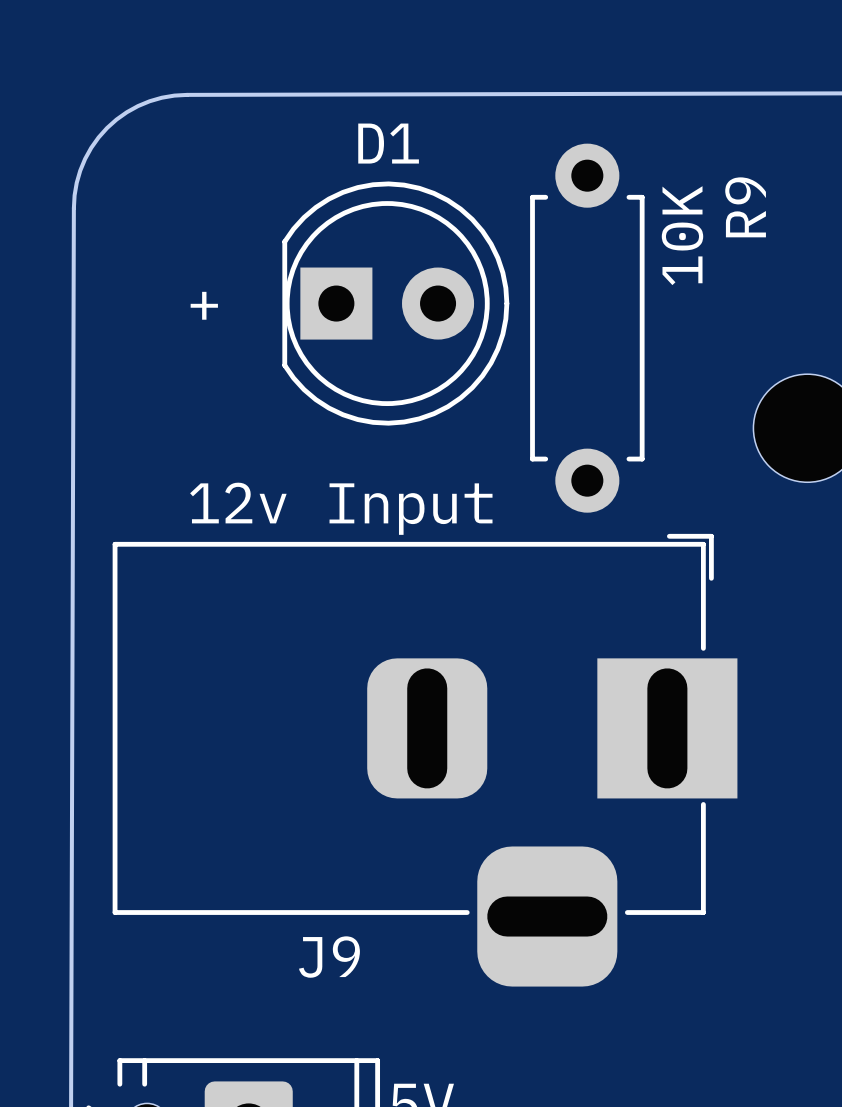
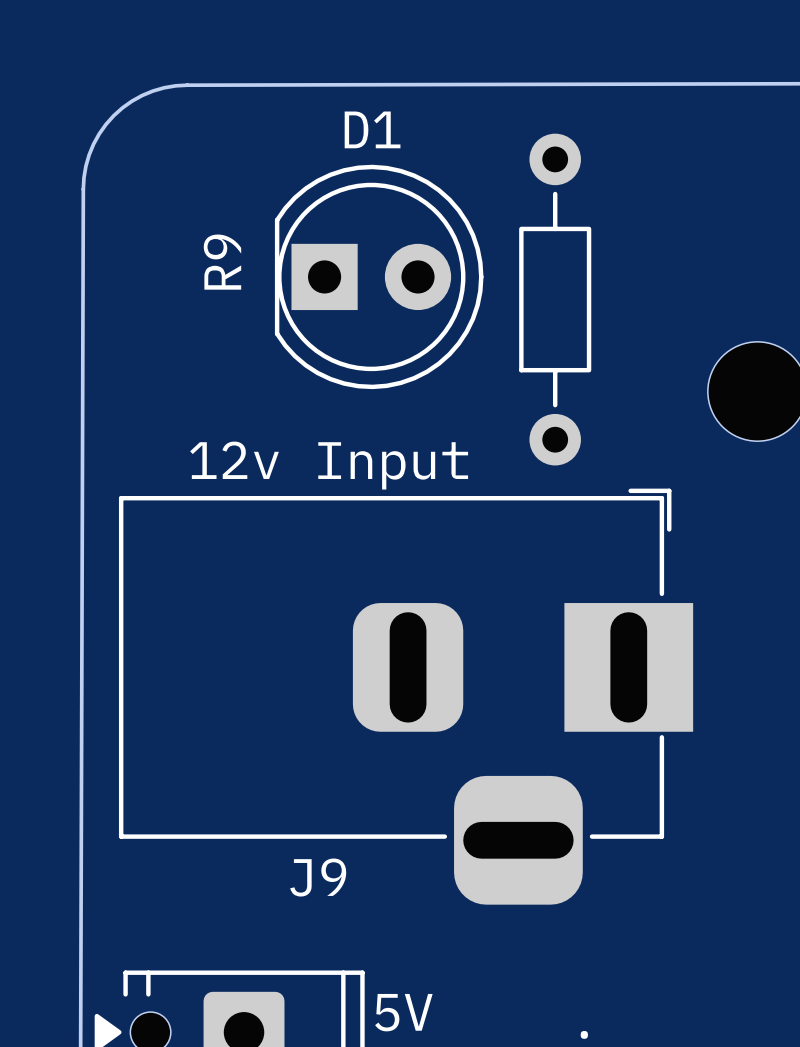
R9 footprint: [530, 143, 645, 513] -> [519, 133, 592, 466]
R9 name position: R9 (745, 207) -> R9 (222, 262)
text: 10K (682, 235) -> none
text: + (204, 305) -> none

